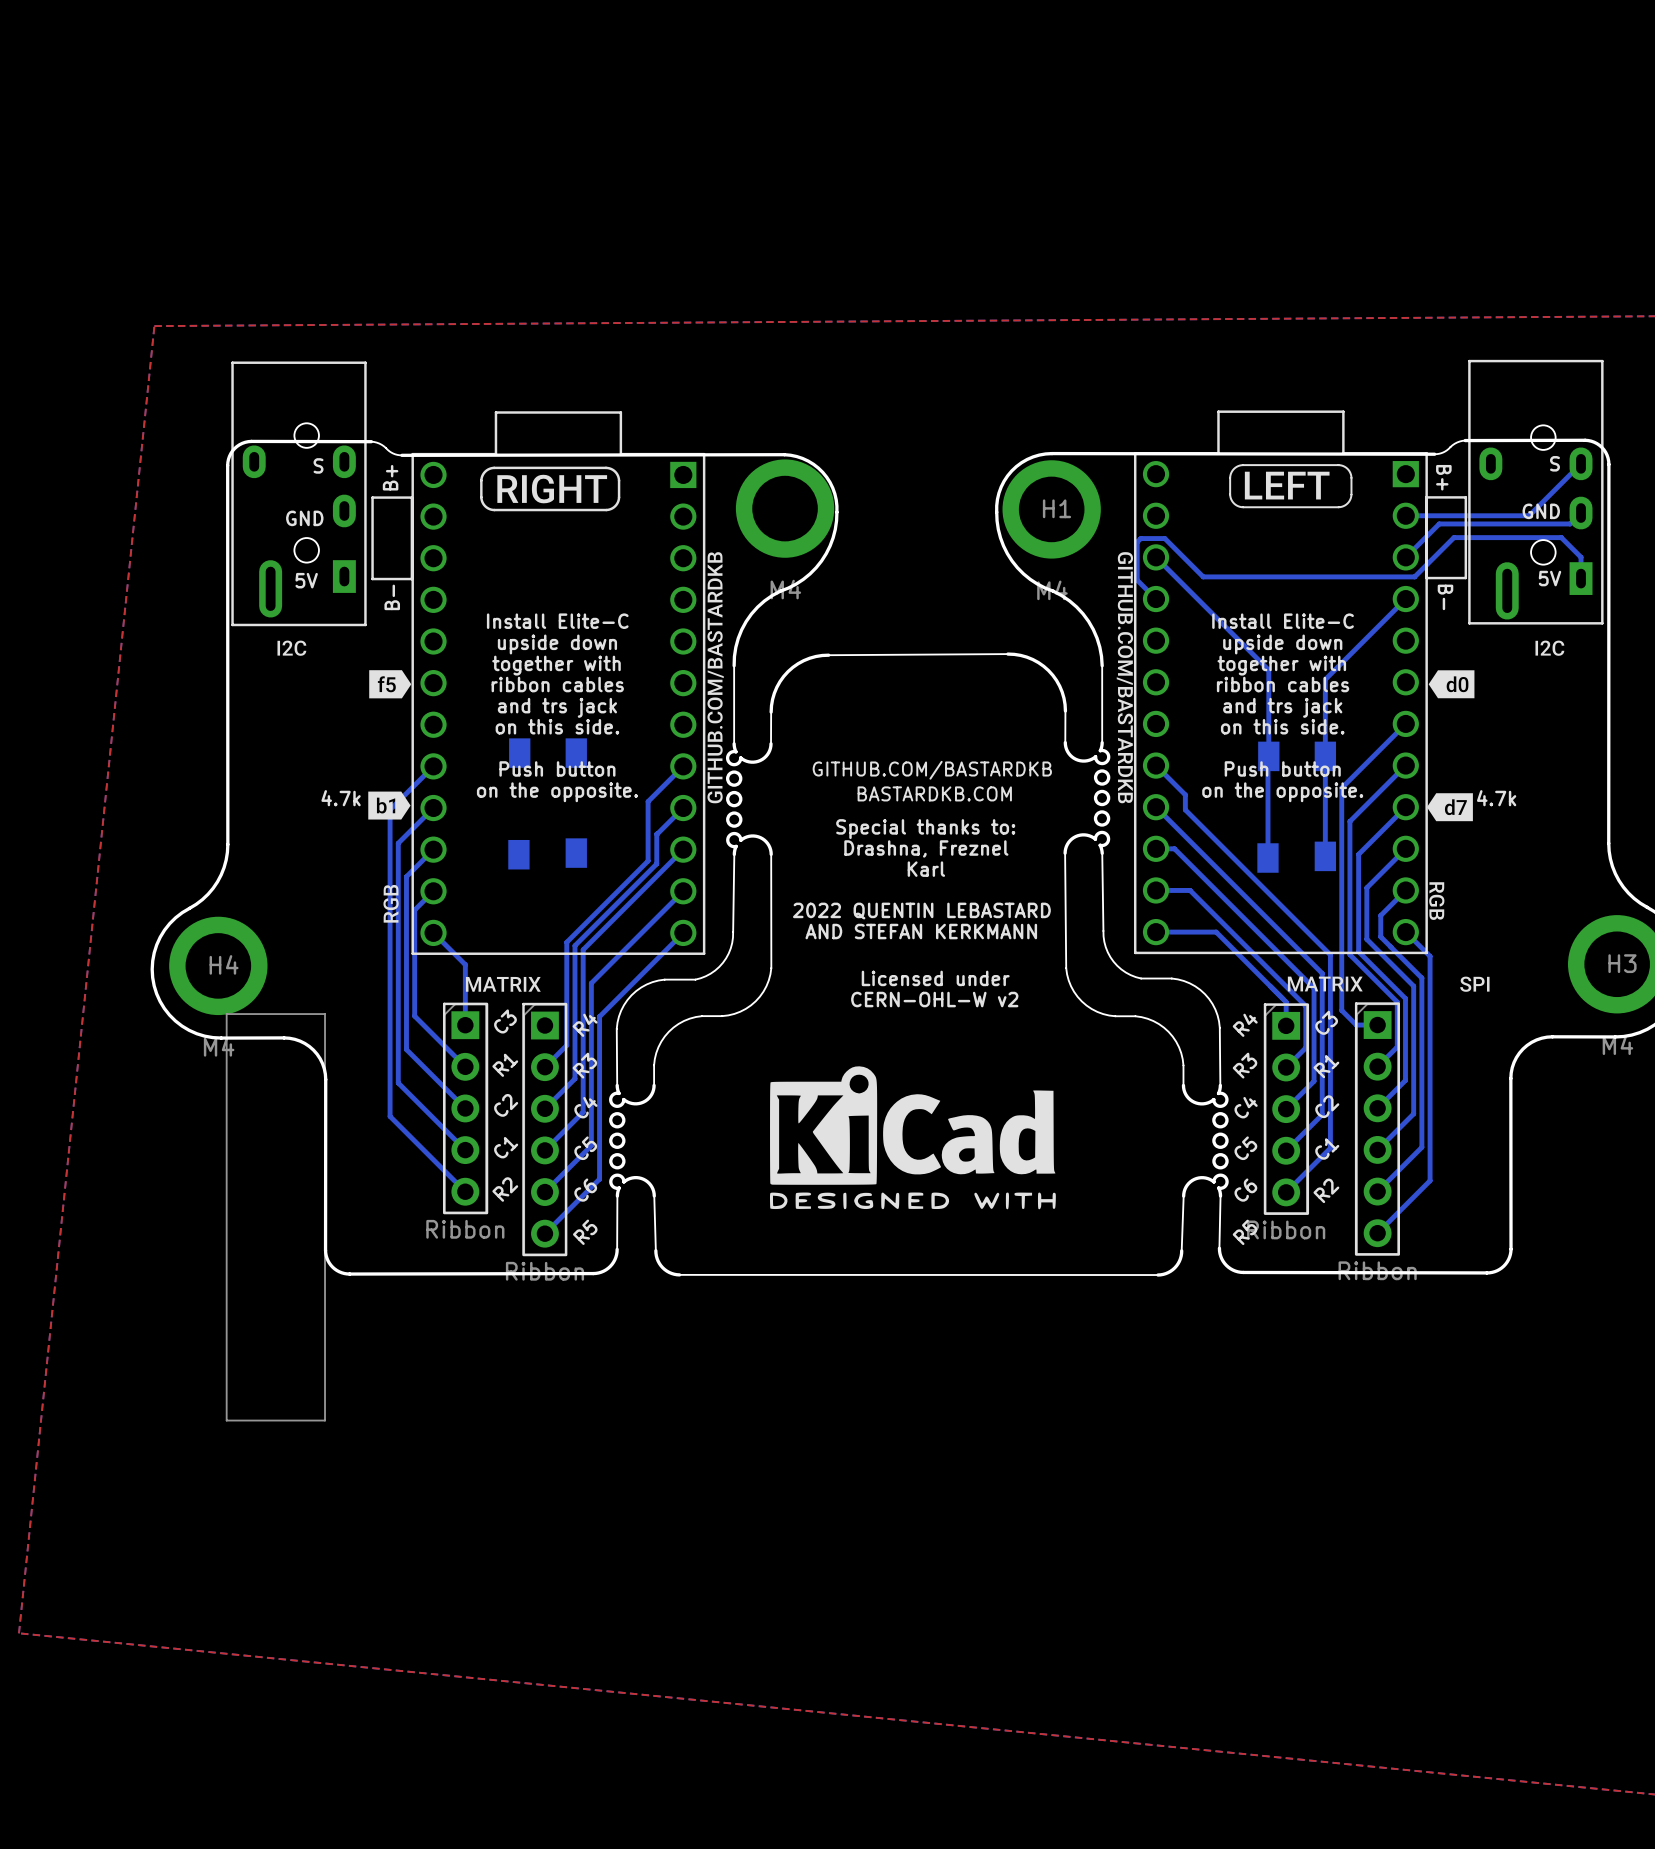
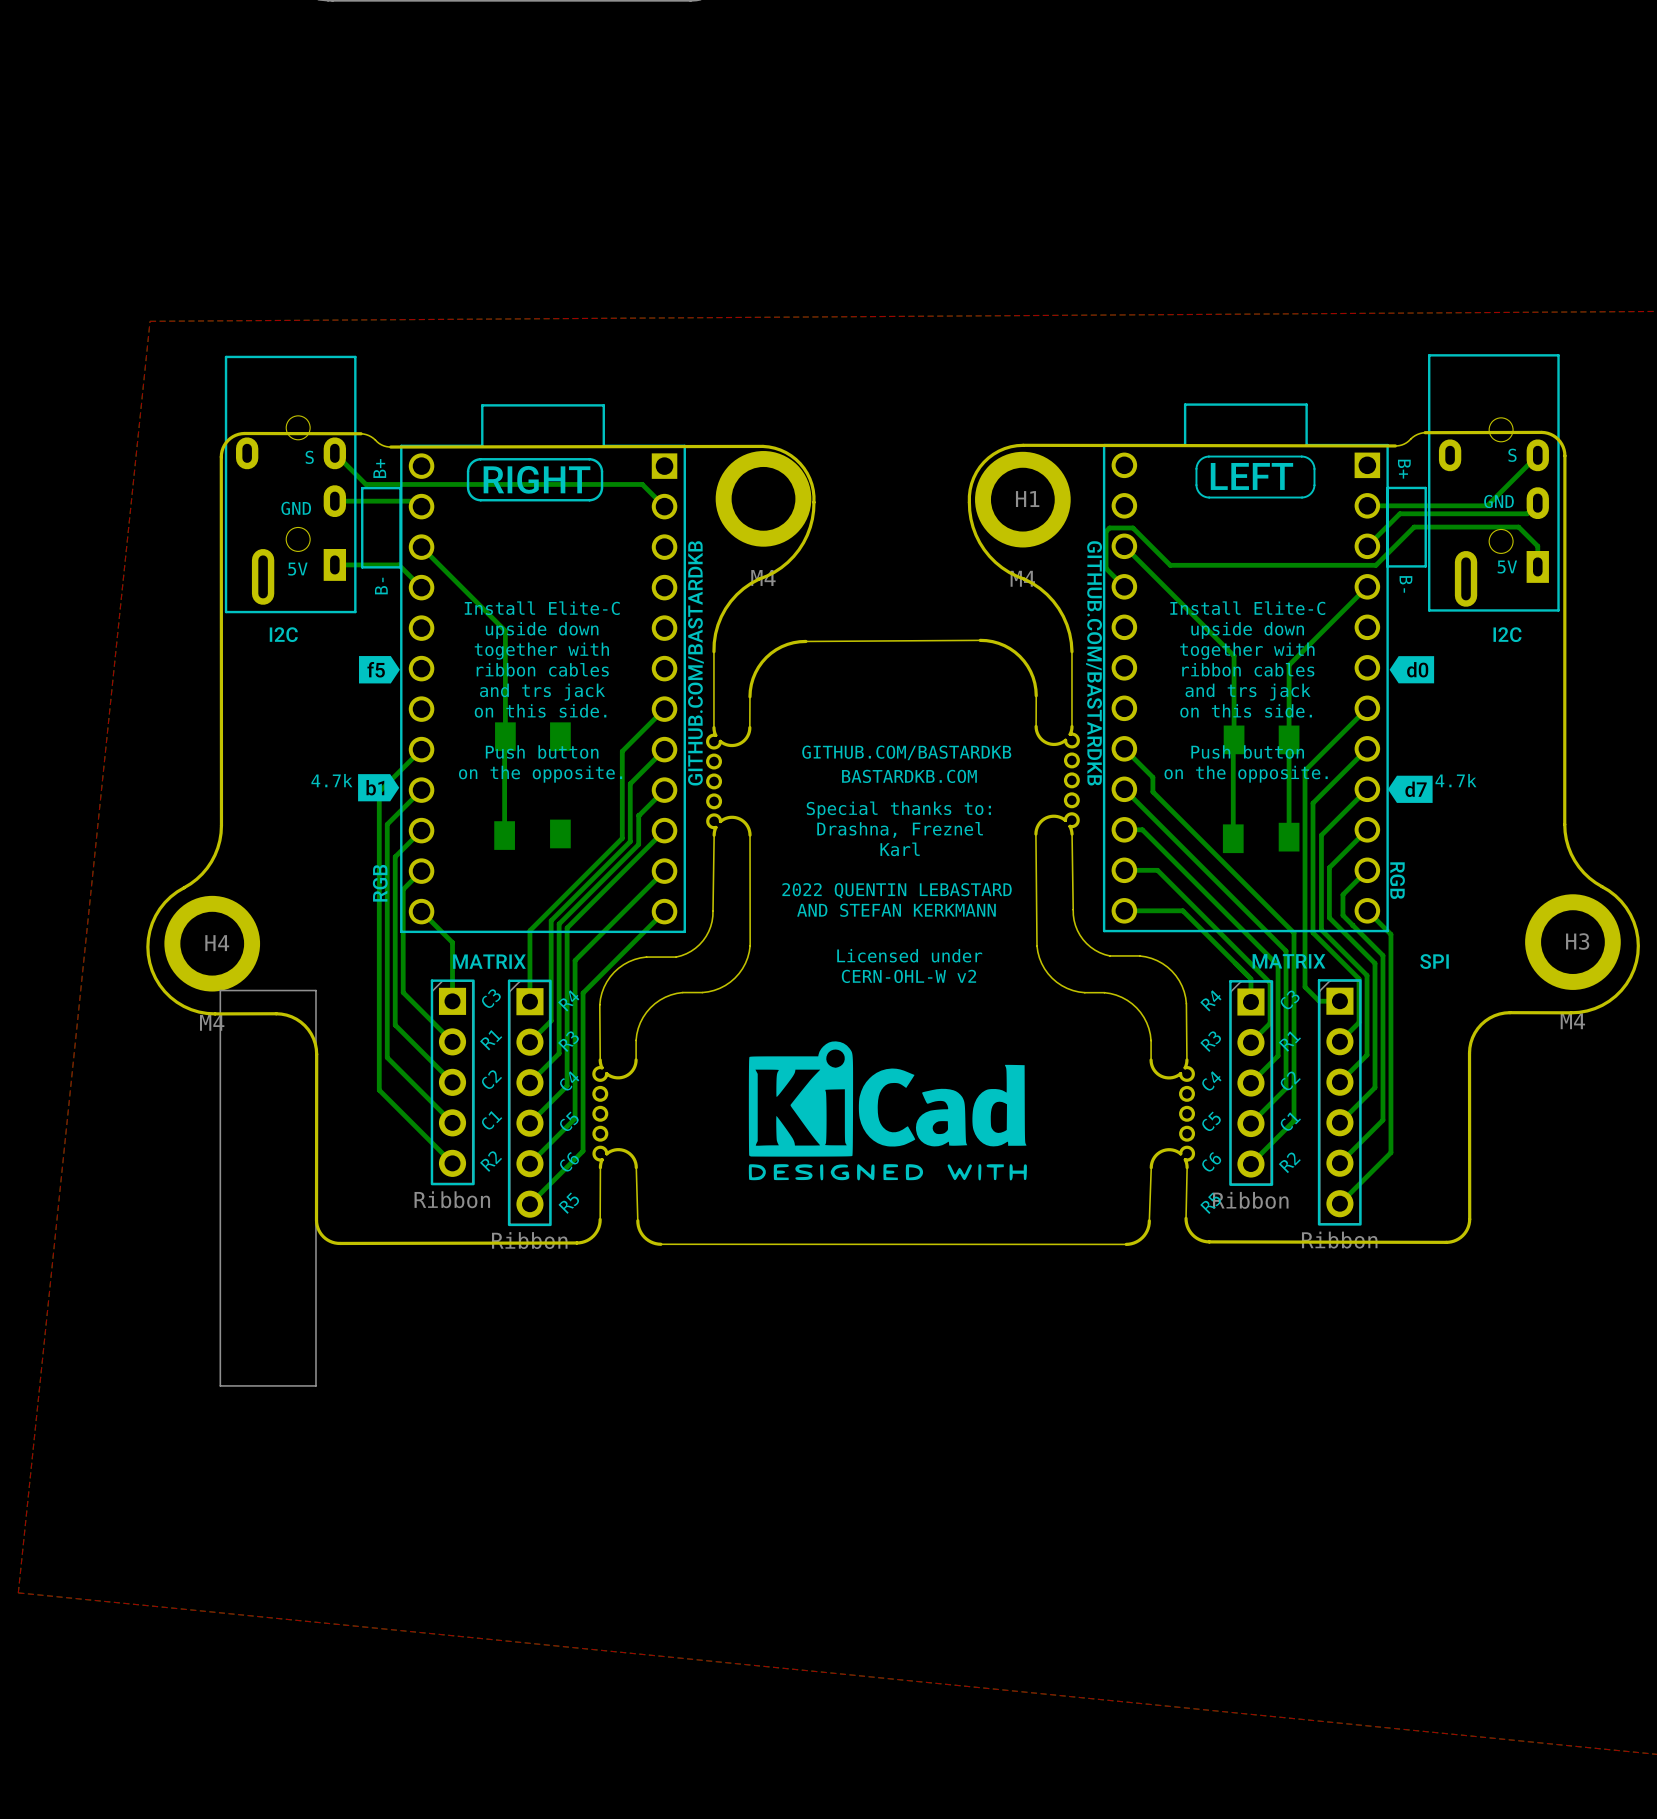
bottom track: none -> (334, 453) (365, 484) (642, 484) (664, 506)
bottom track: none -> (334, 501) (416, 501) (421, 506)
bottom track: none -> (421, 547) (505, 630) (504, 835)
bottom track: none -> (334, 564) (398, 564) (421, 587)
bottom track: none -> (664, 709) (622, 751) (622, 838) (529, 930) (529, 1001)

